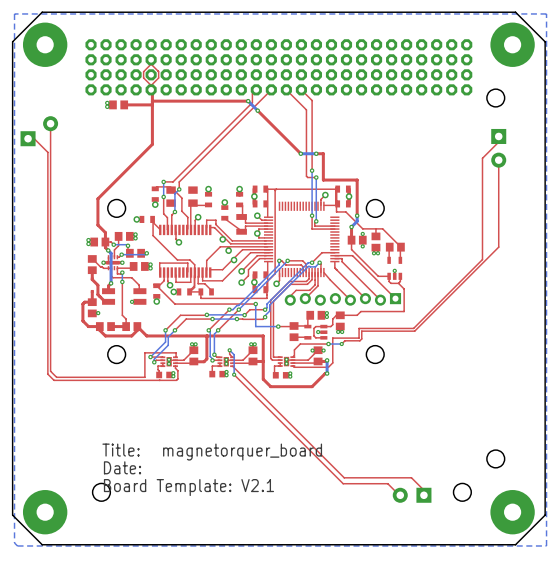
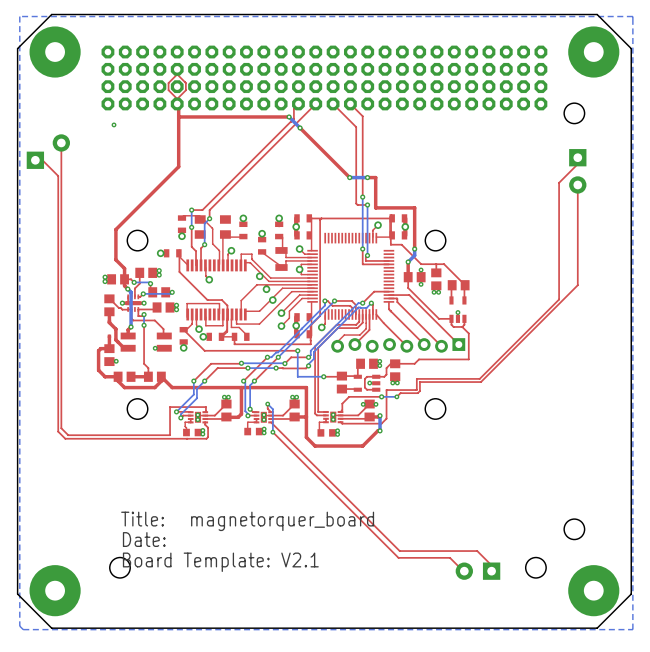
via: (107, 103) -> none
part: (118, 104) -> none
top track: (152, 104) (124, 104) -> none
via: (107, 106) -> none
via: none -> (114, 124)

